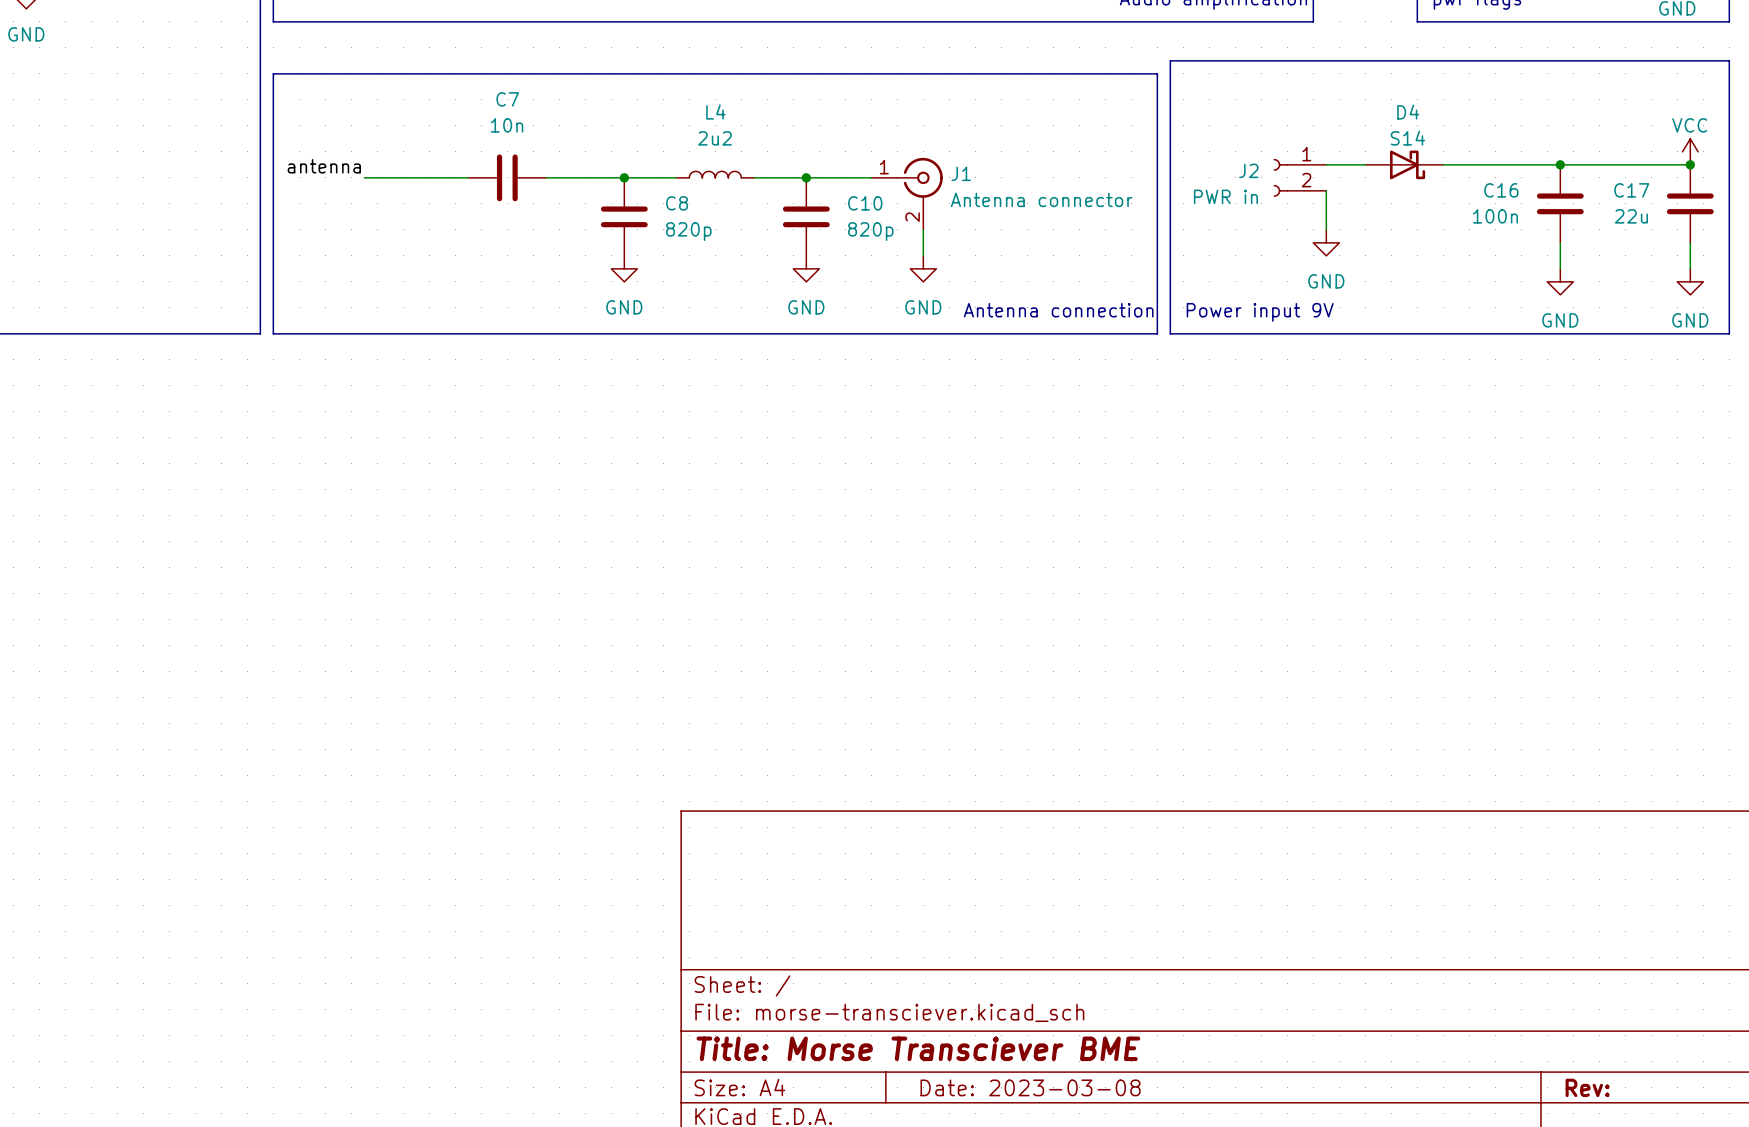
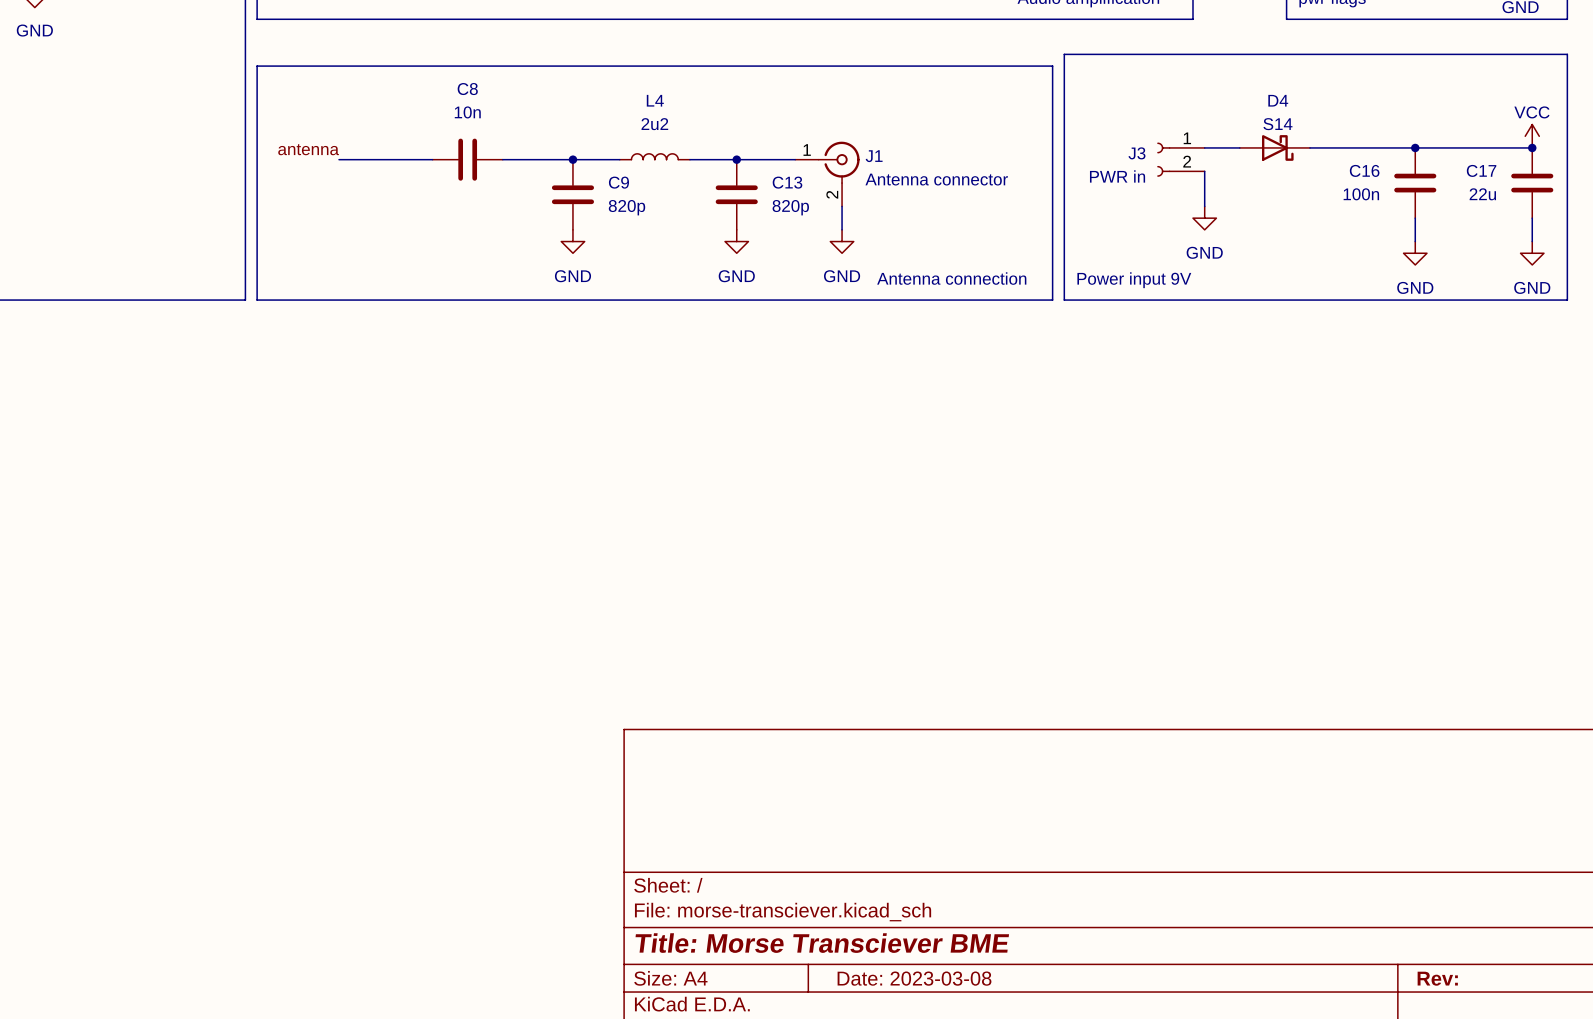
C7 name: C7 (507, 99) -> C8 (467, 89)
J2 name: J2 (1248, 170) -> J3 (1136, 153)
C8 name: C8 (677, 203) -> C9 (618, 182)
C10 name: C10 (865, 203) -> C13 (787, 182)

